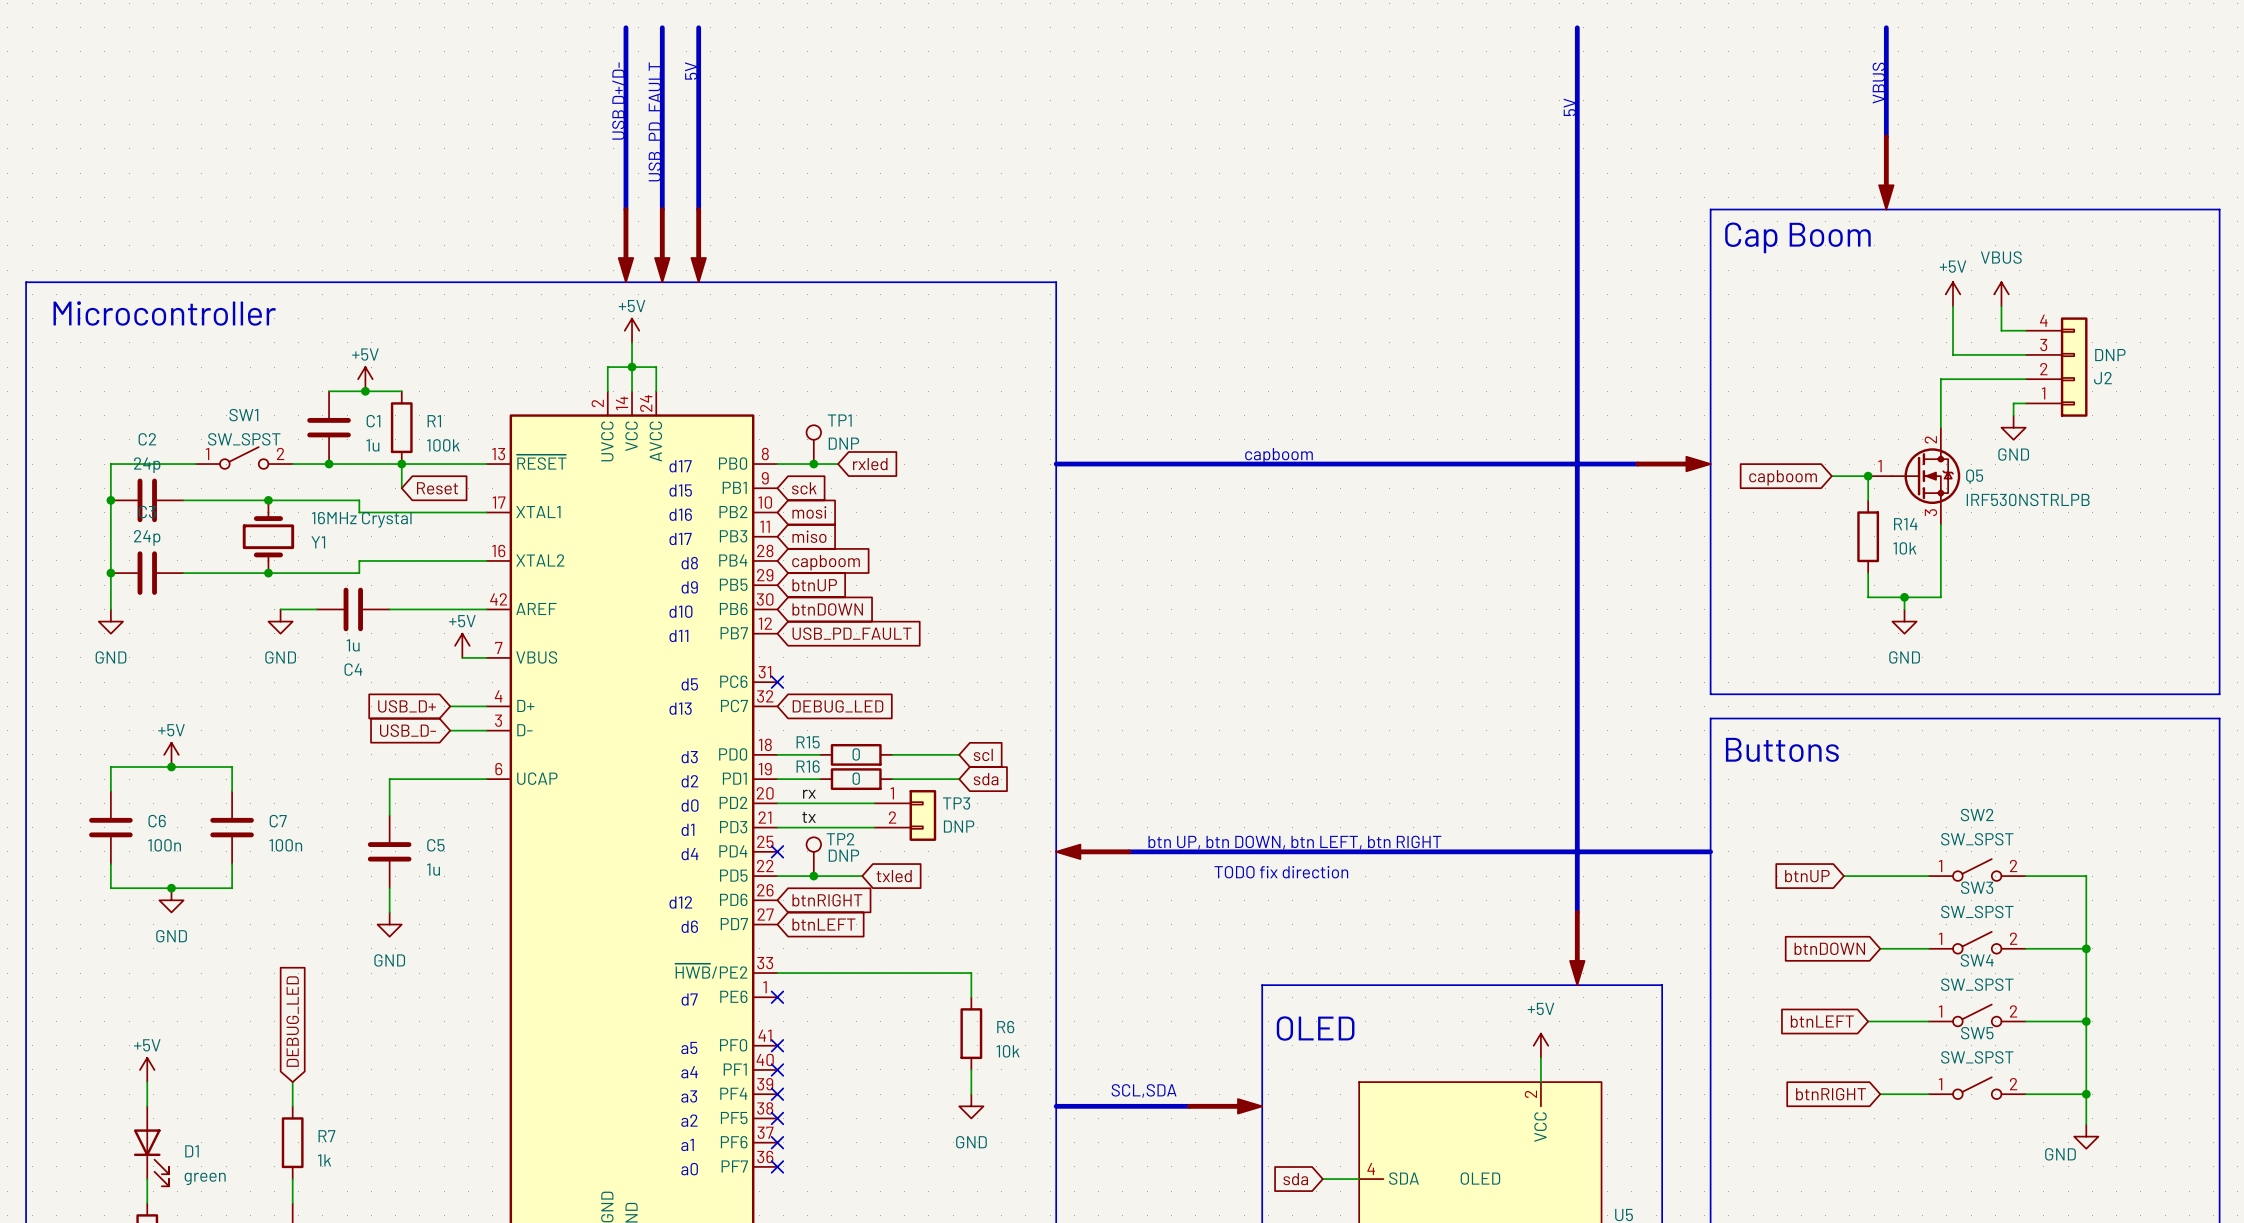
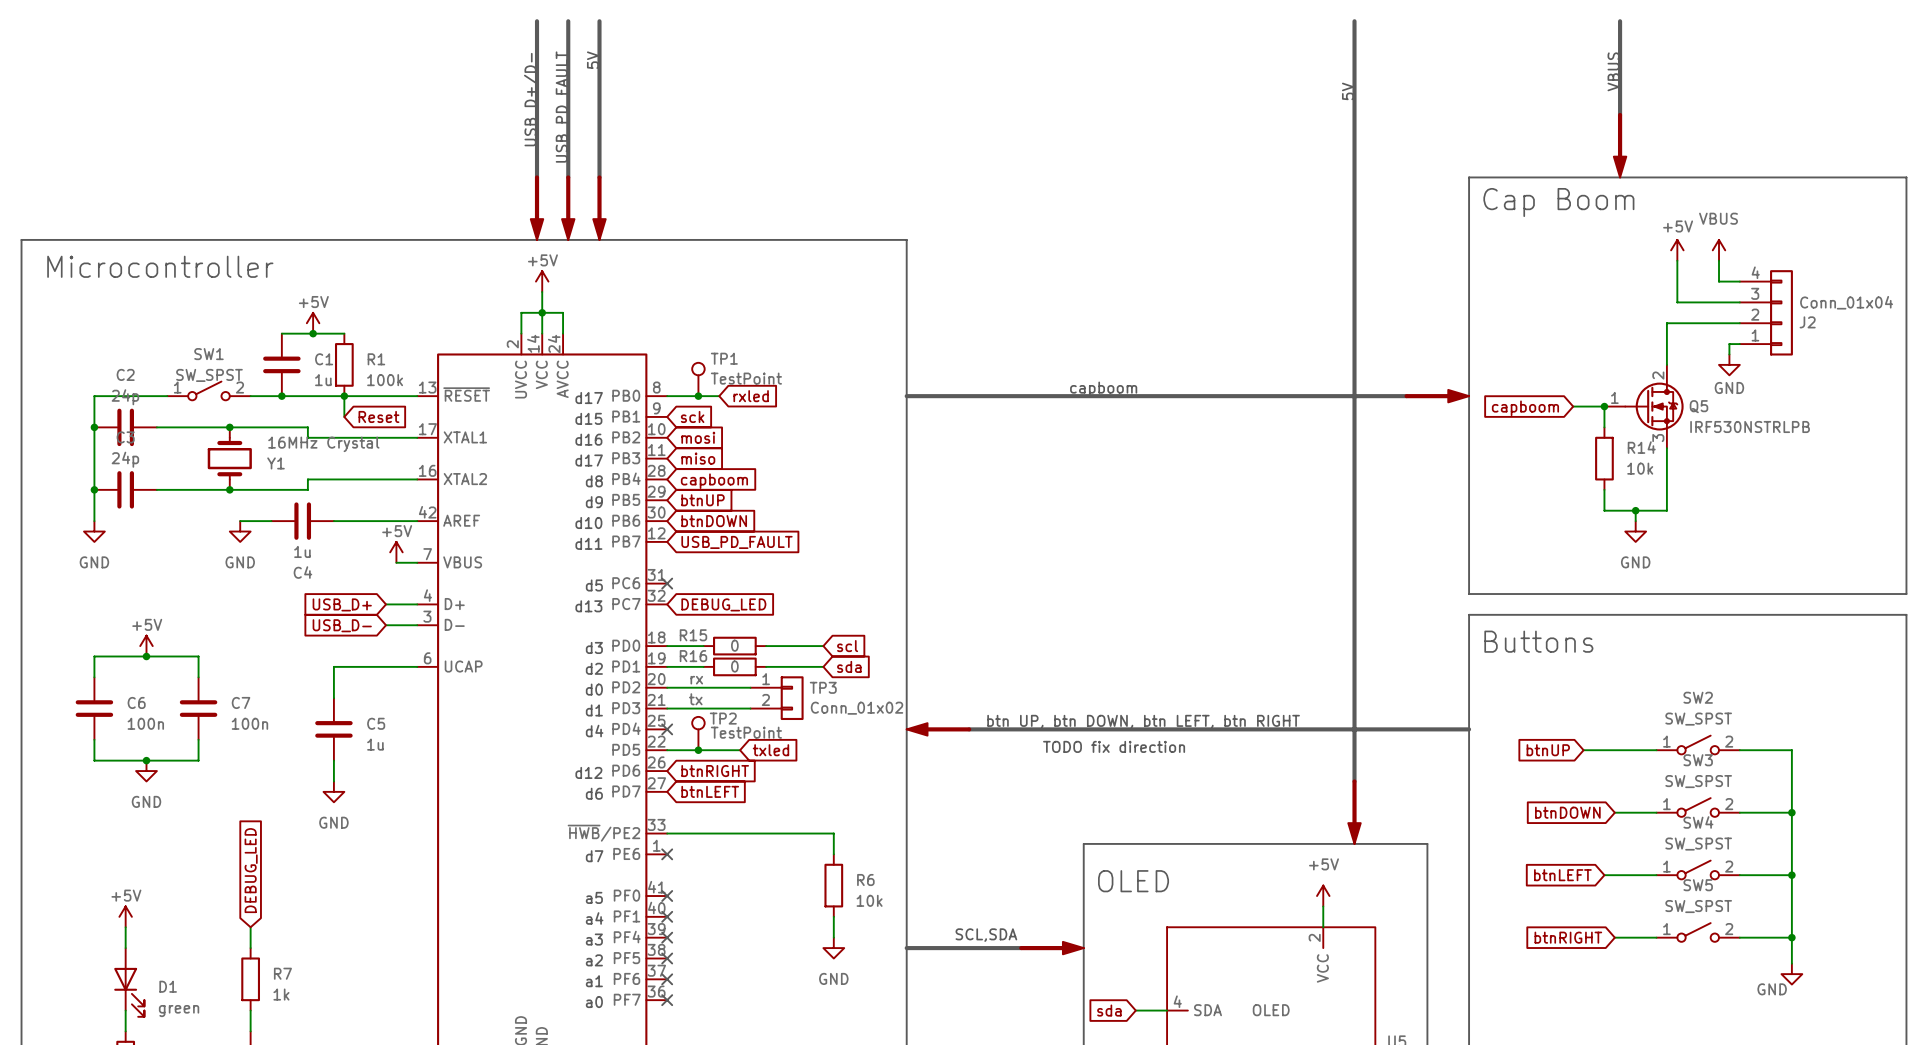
J2 value: DNP (2110, 355) -> Conn_01x04 (1846, 302)
TP1 value: DNP (843, 443) -> TestPoint (746, 378)
TP3 value: DNP (959, 826) -> Conn_01x02 (857, 708)
TP2 value: DNP (843, 855) -> TestPoint (746, 732)

